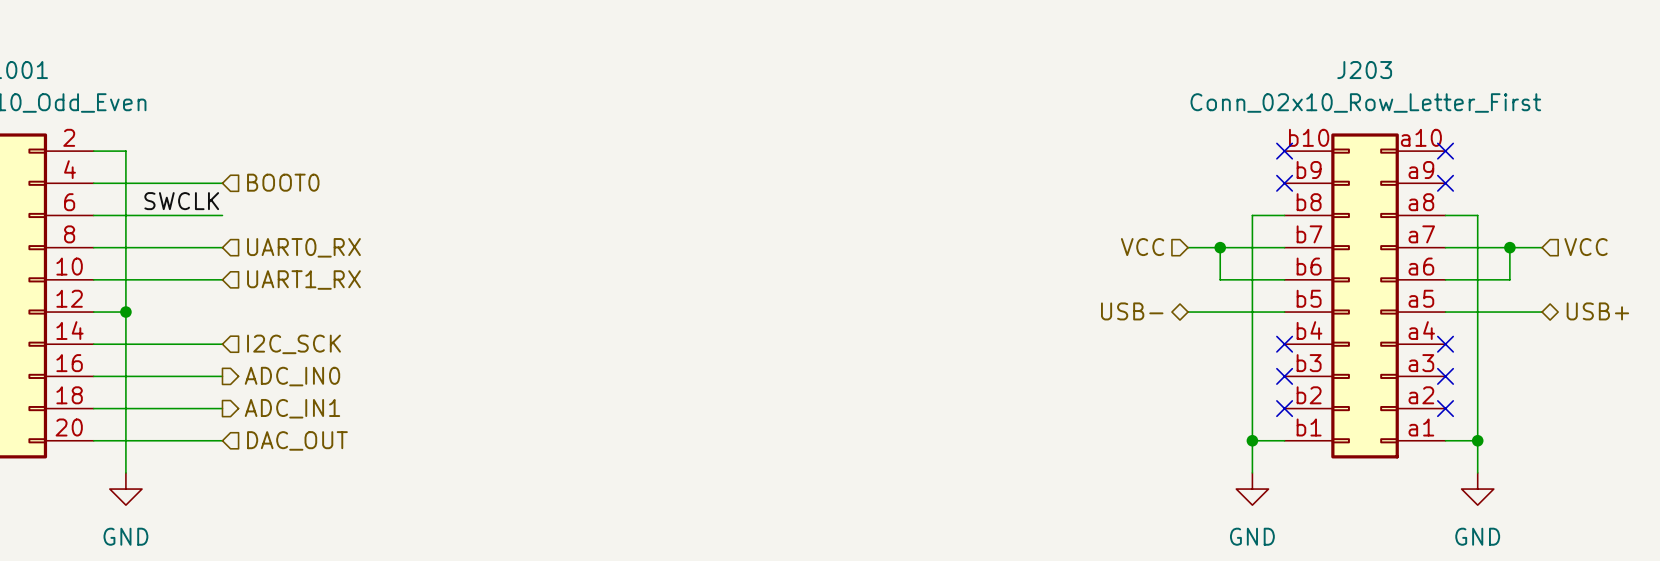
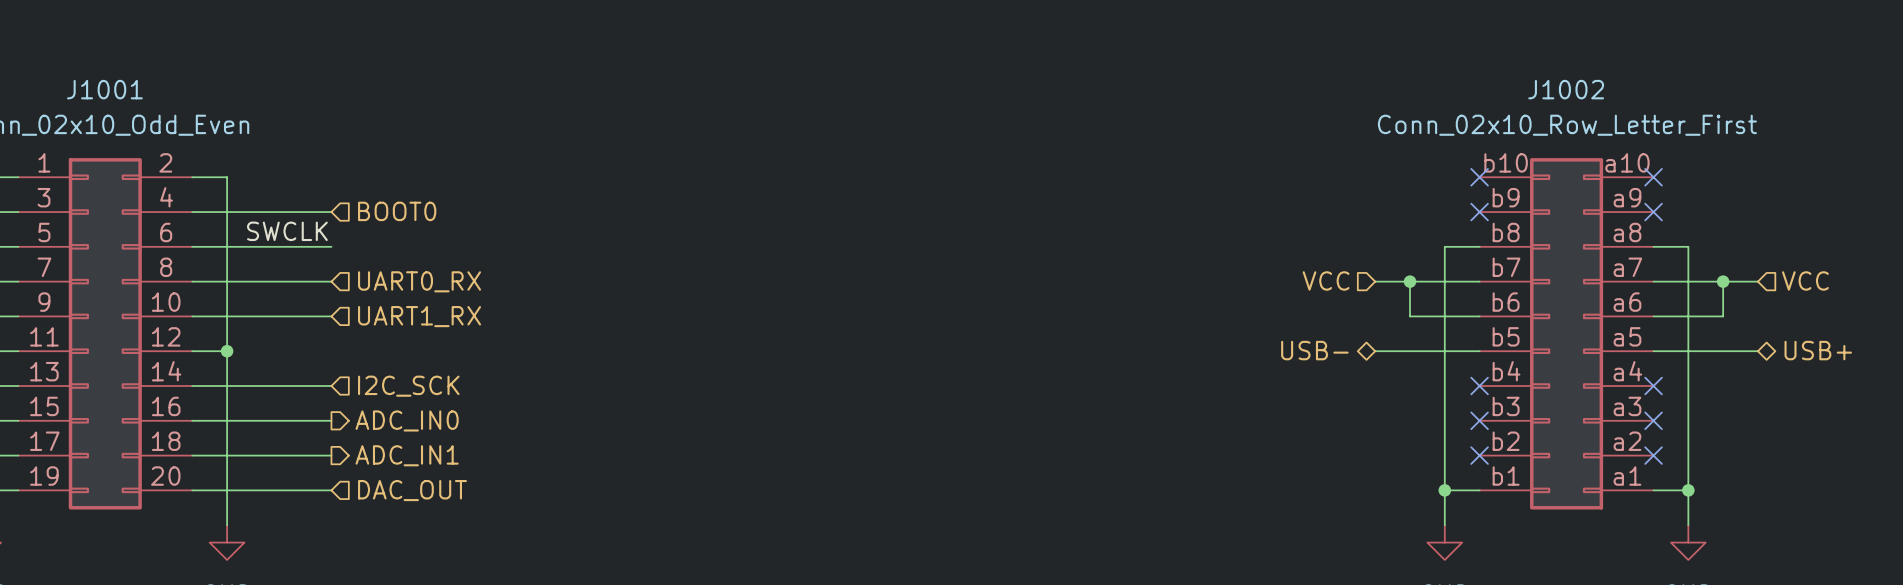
J203 name: J203 (1364, 70) -> J1002 (1566, 89)

